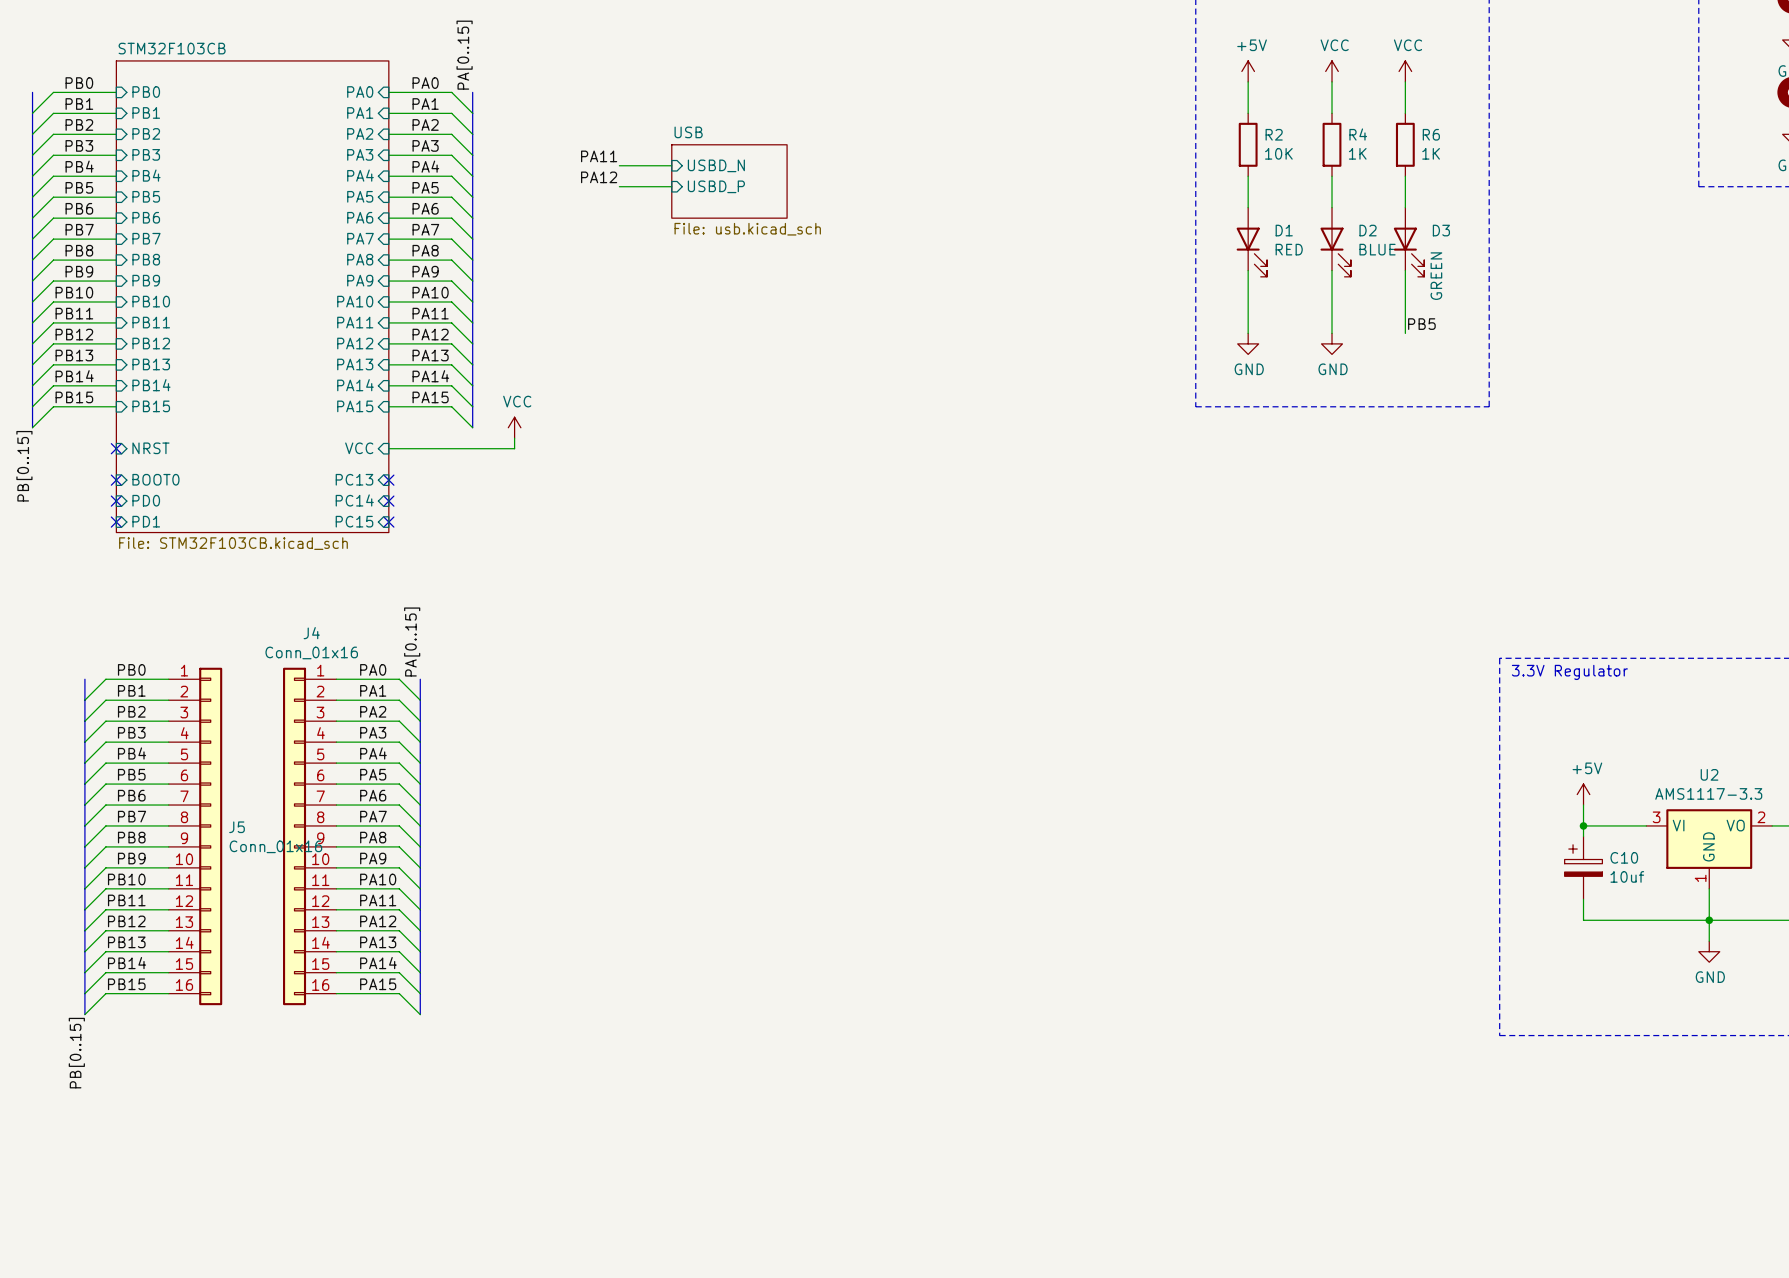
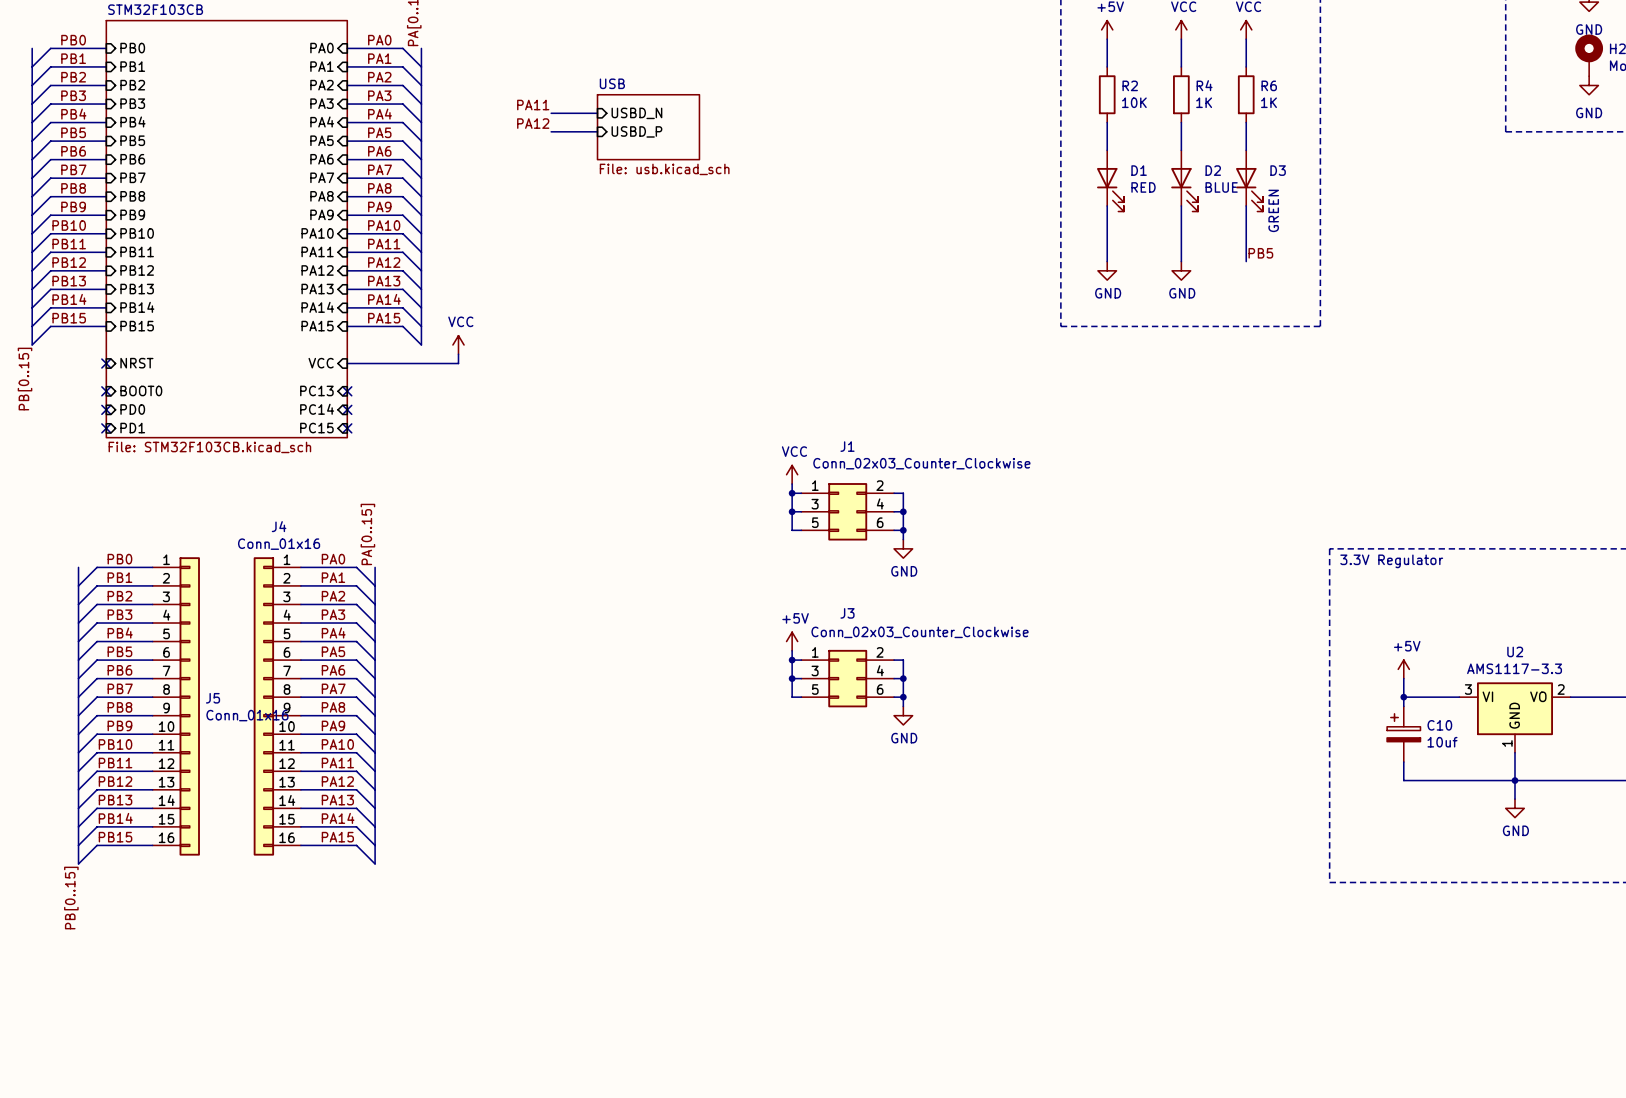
power symbol: none -> VCC (792, 474)
wire: none -> (792, 483) (792, 530) (801, 530)
wire: none -> (792, 493) (801, 493)
junction: none -> (792, 493)
wire: none -> (894, 493) (903, 493) (903, 539)
wire: none -> (792, 511) (801, 511)
junction: none -> (792, 511)
J1: none -> Conn_02x03_Counter_Clockwise (847, 511)
wire: none -> (894, 511) (903, 511)
junction: none -> (903, 511)
wire: none -> (894, 530) (903, 530)
junction: none -> (903, 530)
power symbol: none -> GND (903, 548)
power symbol: none -> +5V (792, 641)
wire: none -> (792, 650) (792, 697) (801, 697)
wire: none -> (792, 660) (801, 660)
junction: none -> (792, 660)
wire: none -> (894, 660) (903, 660) (903, 706)
wire: none -> (792, 678) (801, 678)
junction: none -> (792, 678)
J3: none -> Conn_02x03_Counter_Clockwise (847, 678)
wire: none -> (894, 678) (903, 678)
junction: none -> (903, 678)
wire: none -> (894, 697) (903, 697)
junction: none -> (903, 697)
power symbol: none -> GND (903, 715)

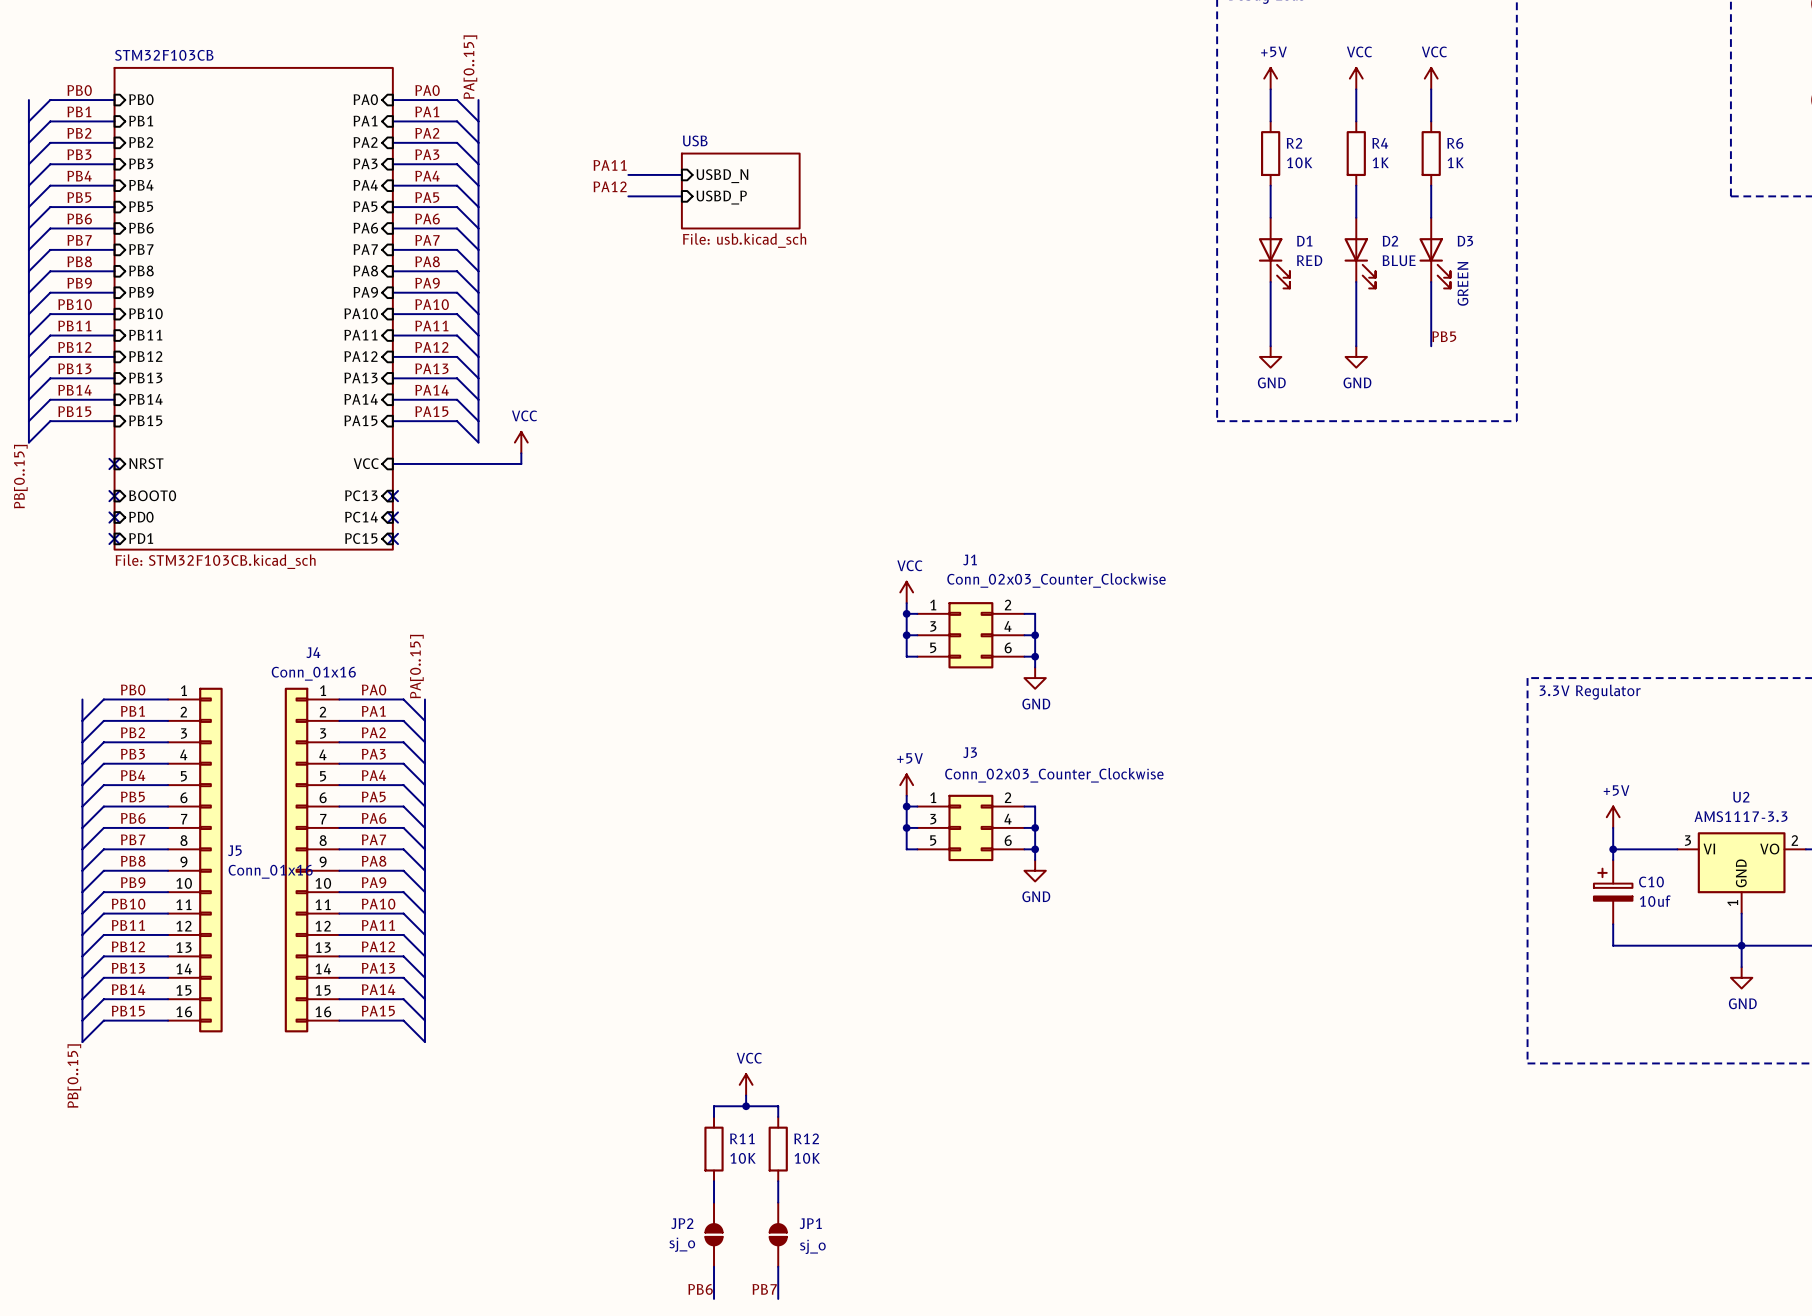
power symbol: none -> VCC (746, 1084)
wire: none -> (746, 1095) (746, 1106)
junction: none -> (746, 1106)
wire: none -> (714, 1116) (714, 1106) (778, 1106) (778, 1116)
R11: none -> 10K (714, 1149)
R12: none -> 10K (778, 1149)
wire: none -> (714, 1181) (714, 1202)
wire: none -> (778, 1181) (778, 1202)
JP2: none -> sj_o (714, 1234)
JP1: none -> sj_o (778, 1234)
wire: none -> (714, 1266) (714, 1298)
wire: none -> (778, 1266) (778, 1298)
label: none -> PB6 (700, 1289)
label: none -> PB7 (764, 1289)

